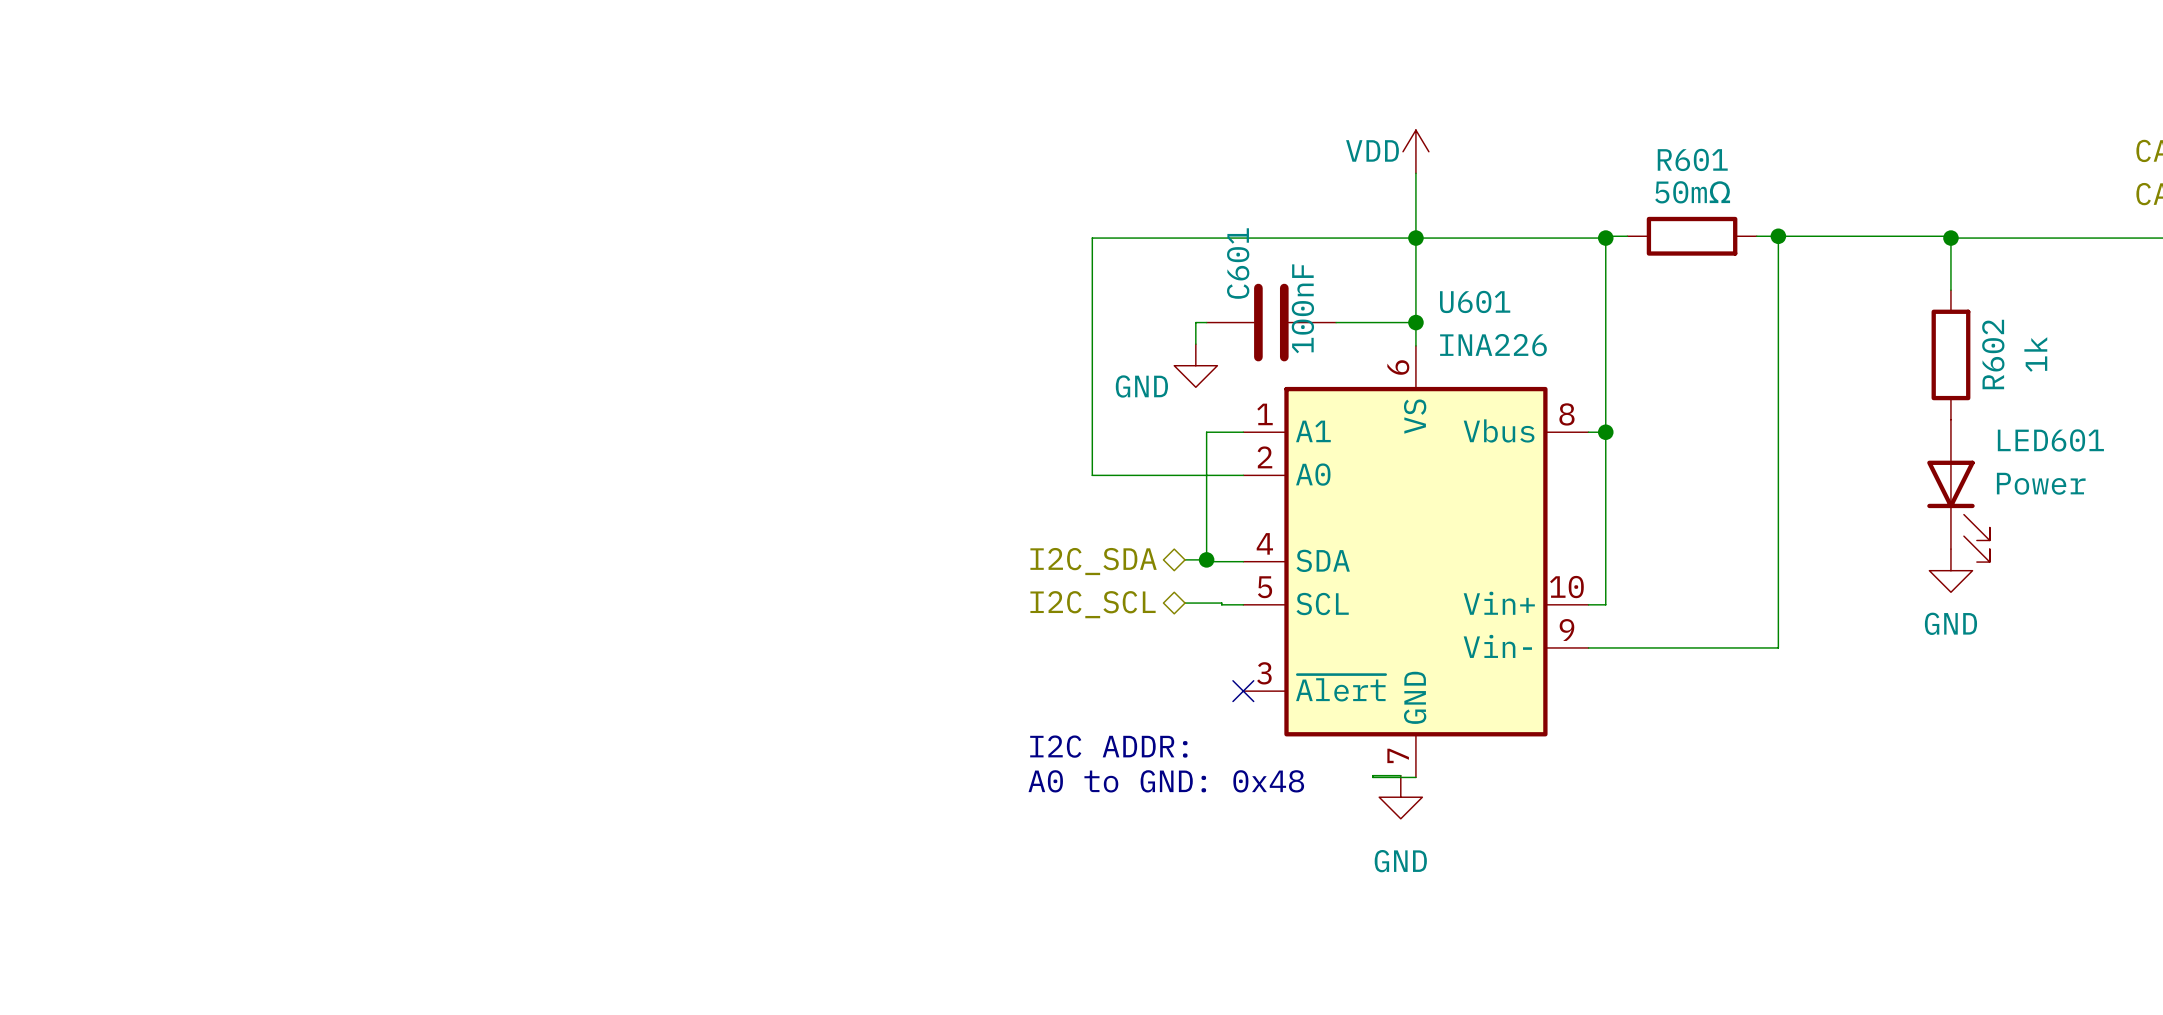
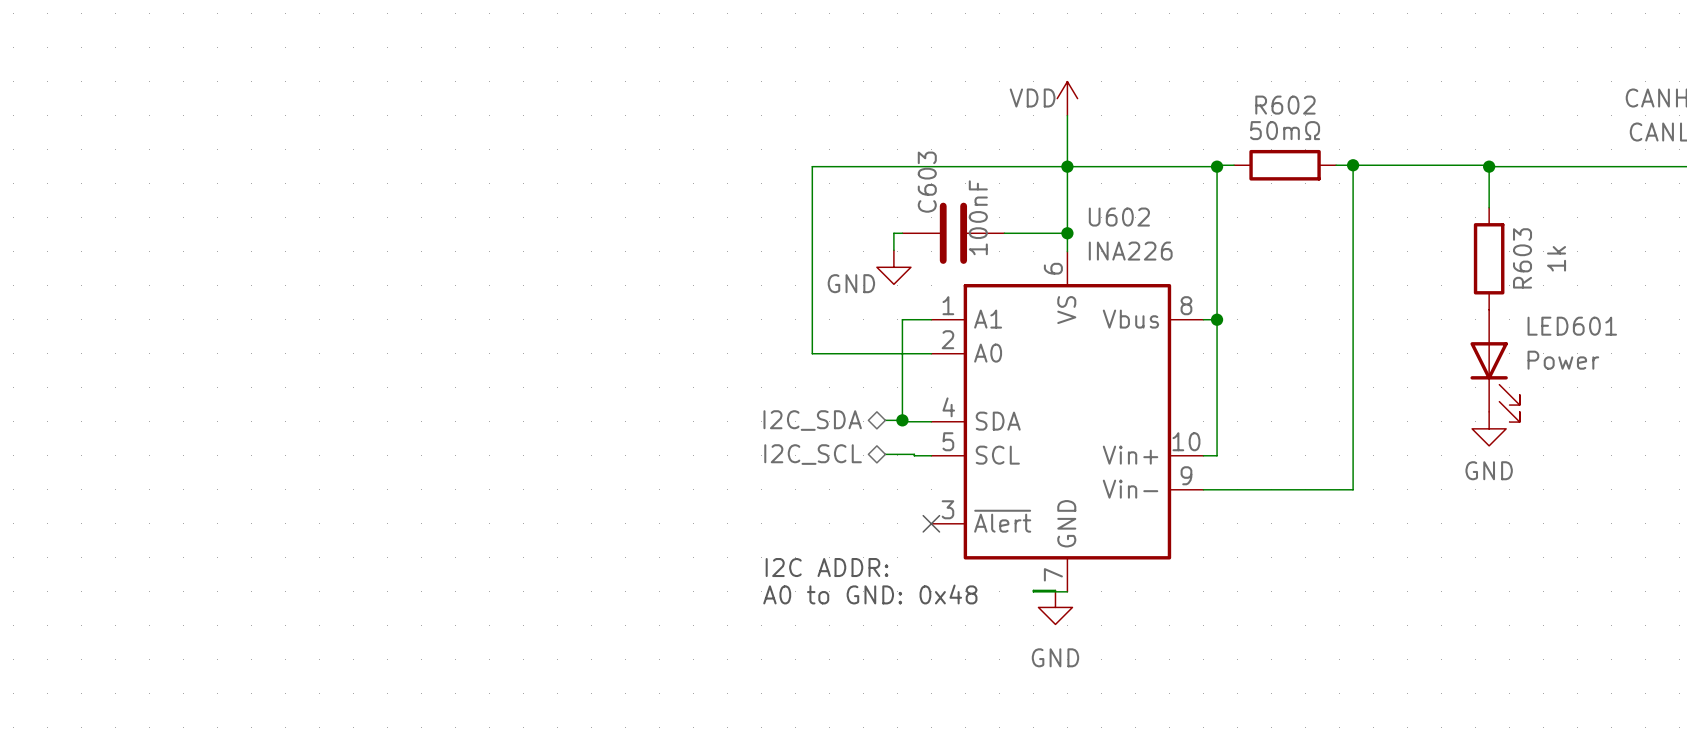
R601 name: R601 (1692, 159) -> R602 (1285, 105)
C601 name: C601 (1238, 263) -> C603 (927, 182)
U601 name: U601 (1475, 301) -> U602 (1119, 217)
R602 name: R602 (1993, 354) -> R603 (1522, 258)

